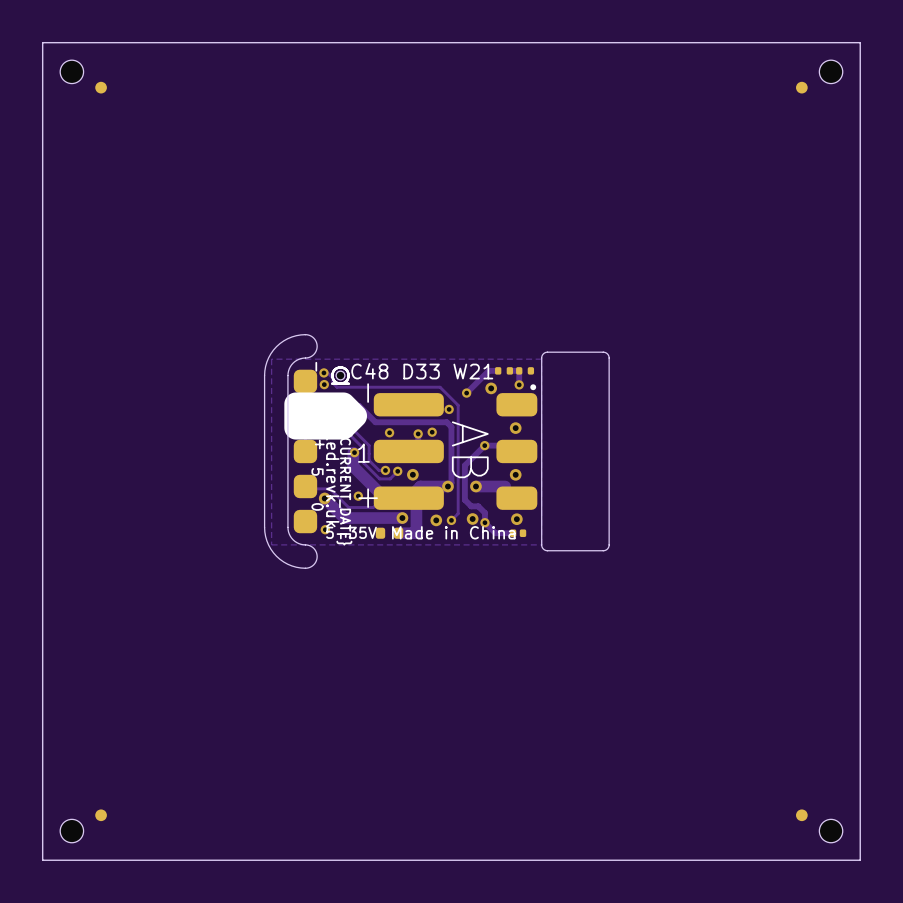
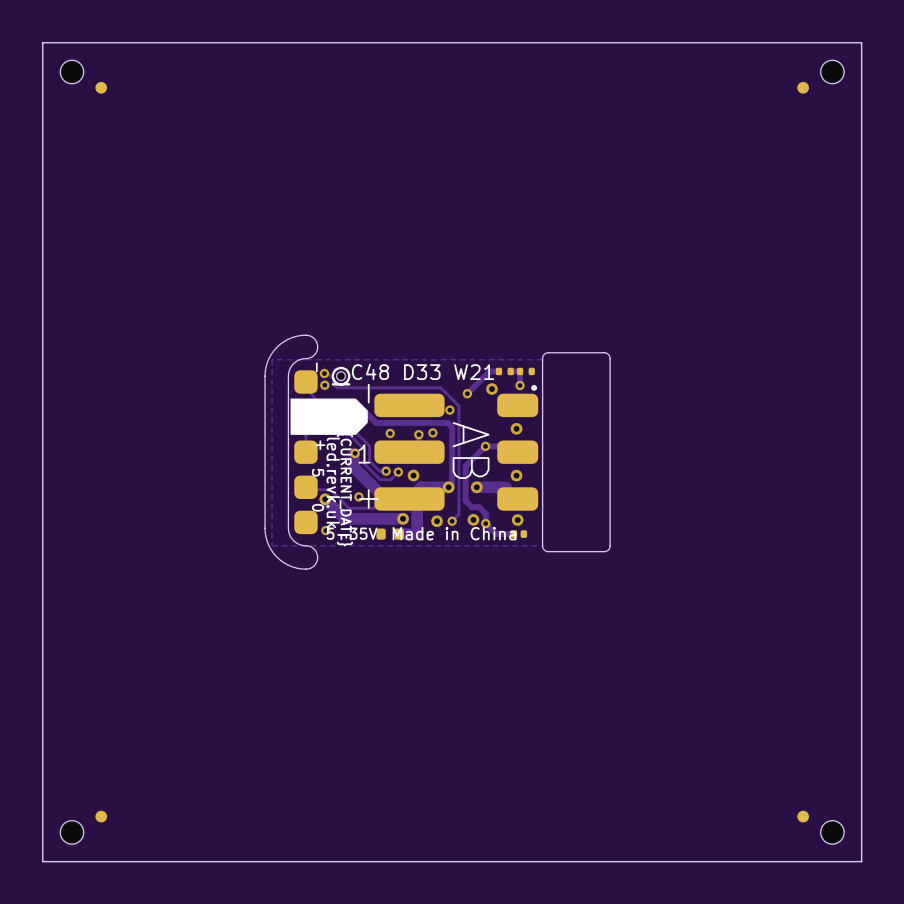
part footprint: [331, 366, 350, 385] -> [336, 371, 346, 381]
part footprint: [284, 392, 368, 440] -> [290, 398, 368, 435]

